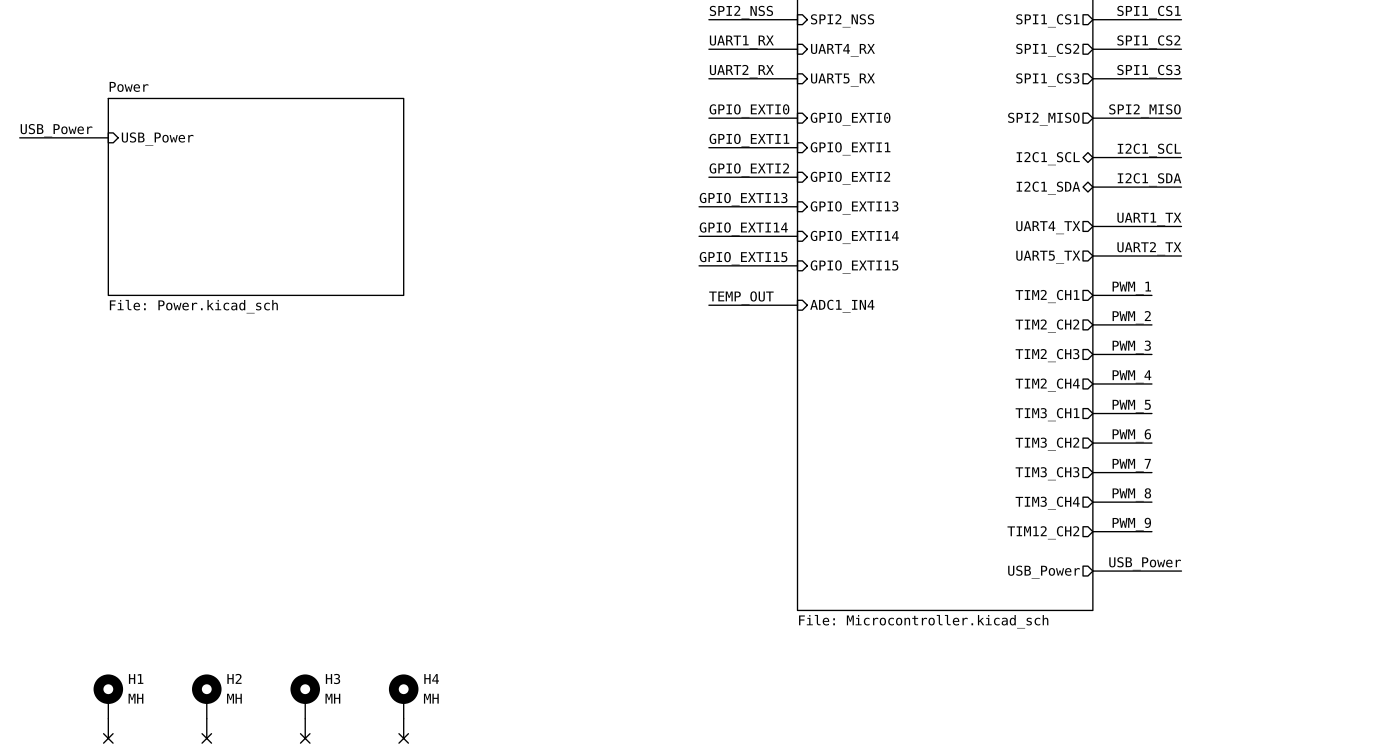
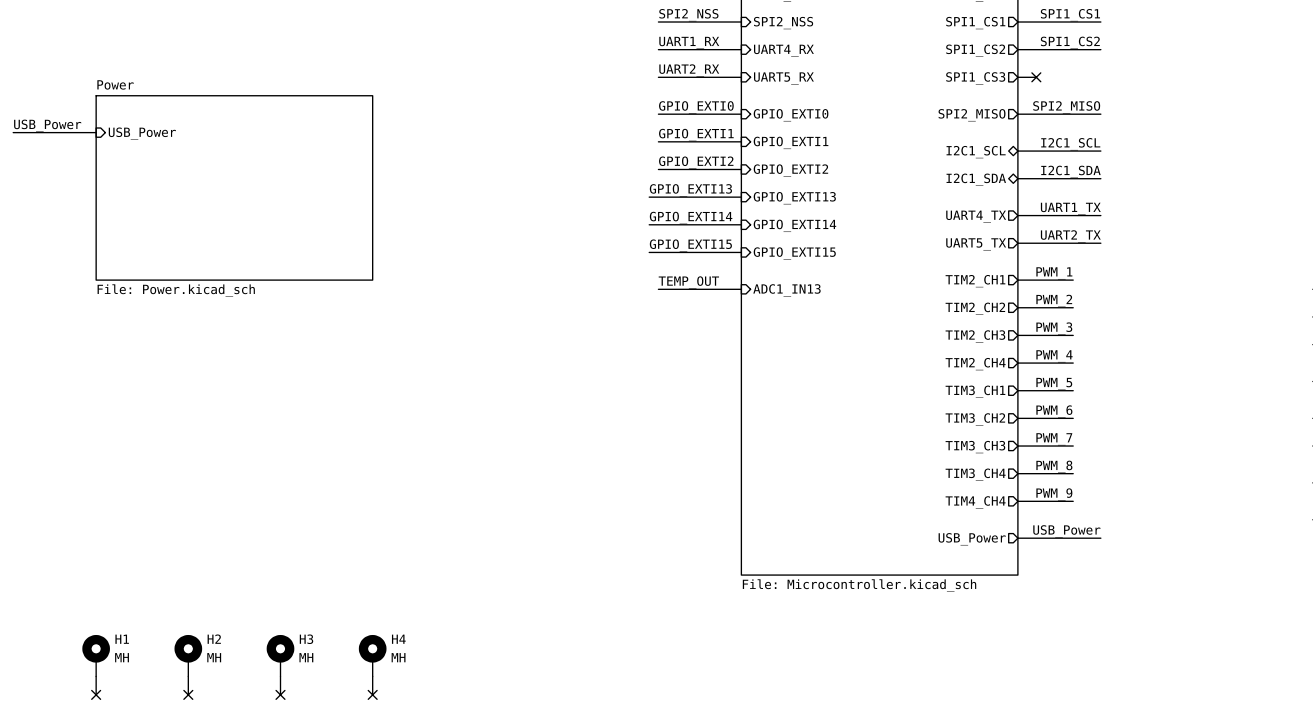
label: SPI1_CS3 (1148, 71) -> none
wire: (1112, 78) (1181, 78) -> none
no-connect mark: none -> (1036, 77)
sheet pin: ADC1_IN4 (842, 306) -> ADC1_IN13 (786, 290)
sheet pin: TIM12_CH2 (1043, 532) -> TIM4_CH4 (975, 502)

